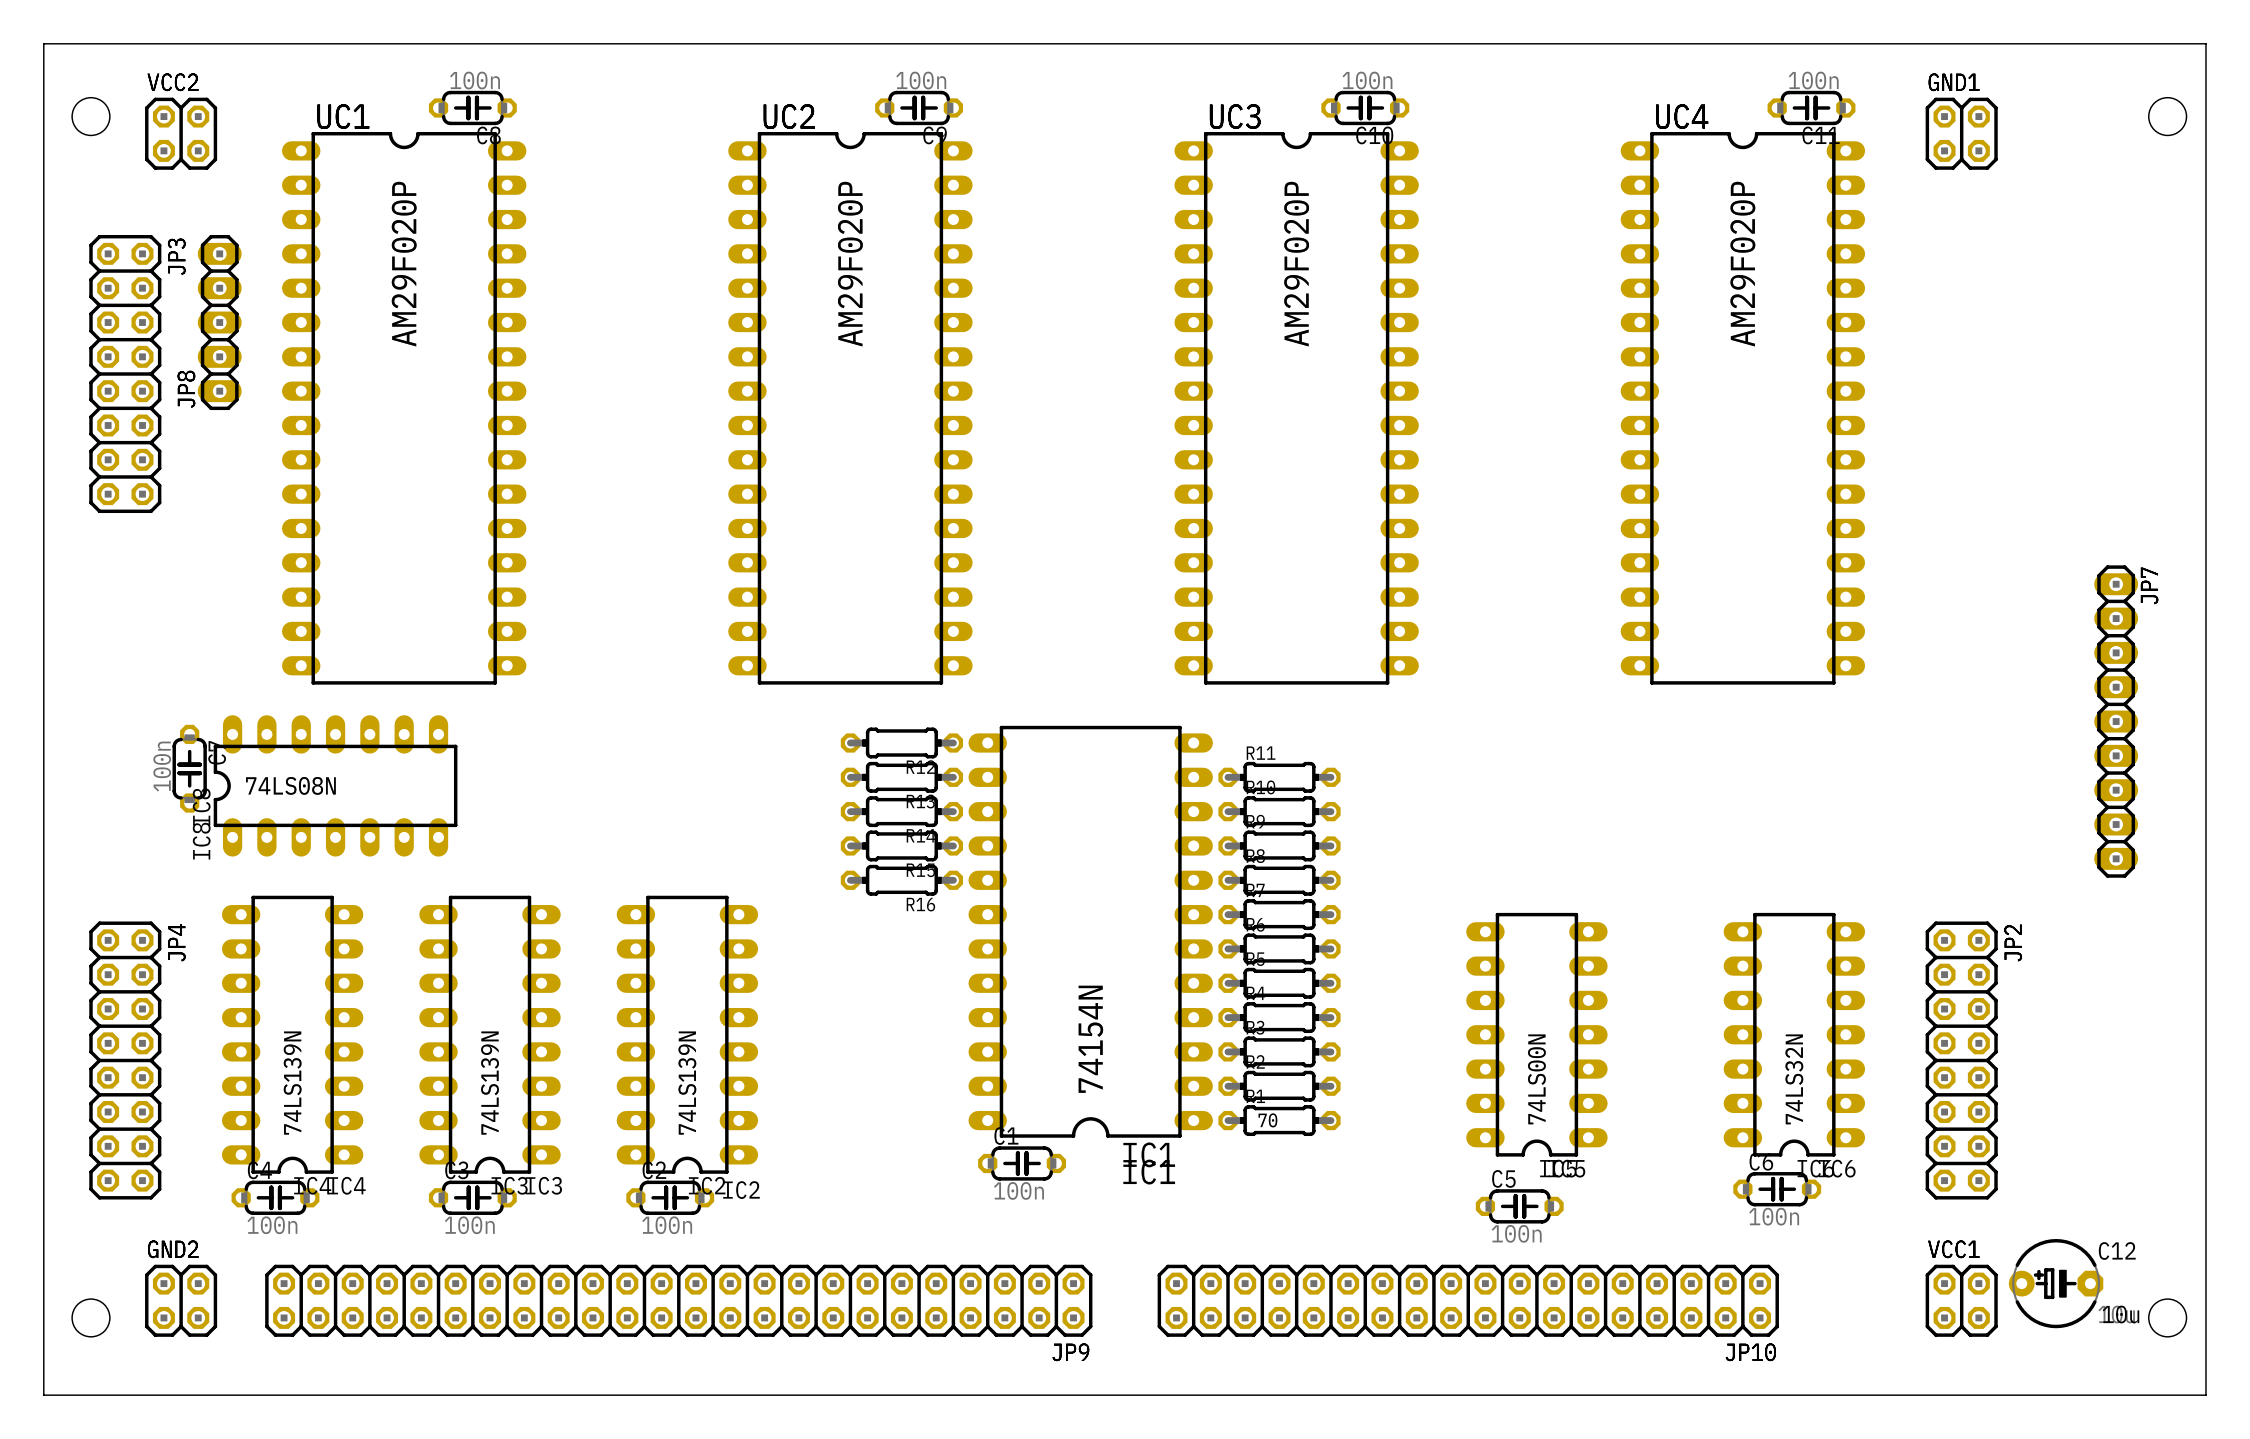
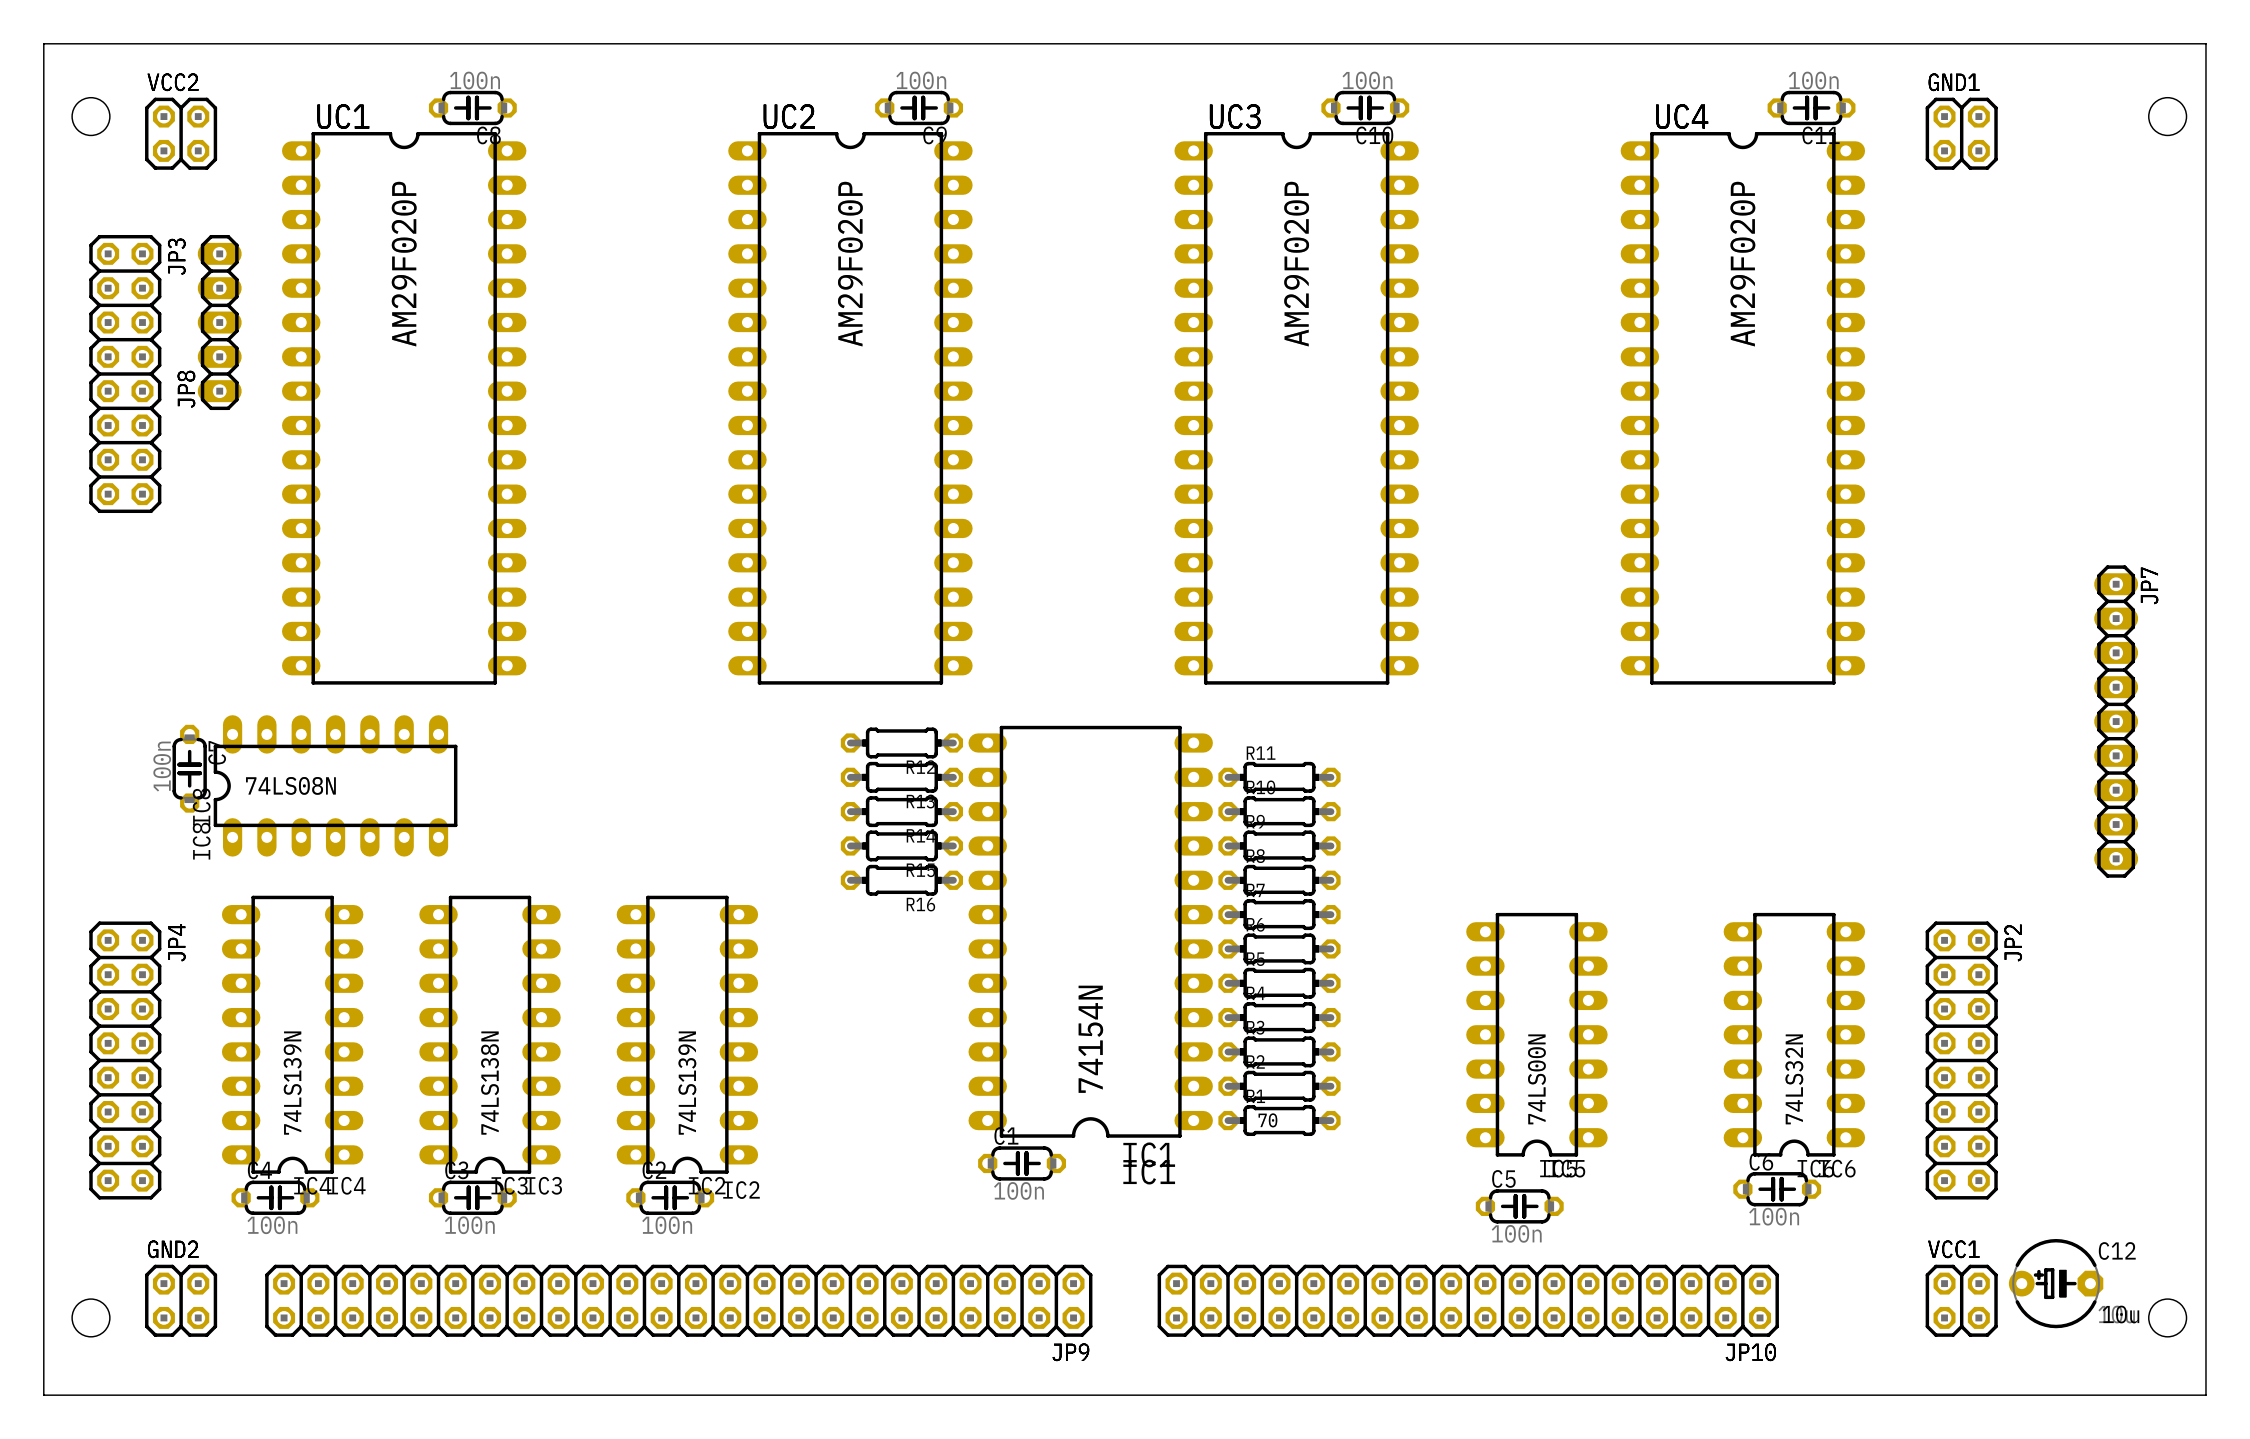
text: 74LS139N (490, 1083) -> 74LS138N (490, 1083)

